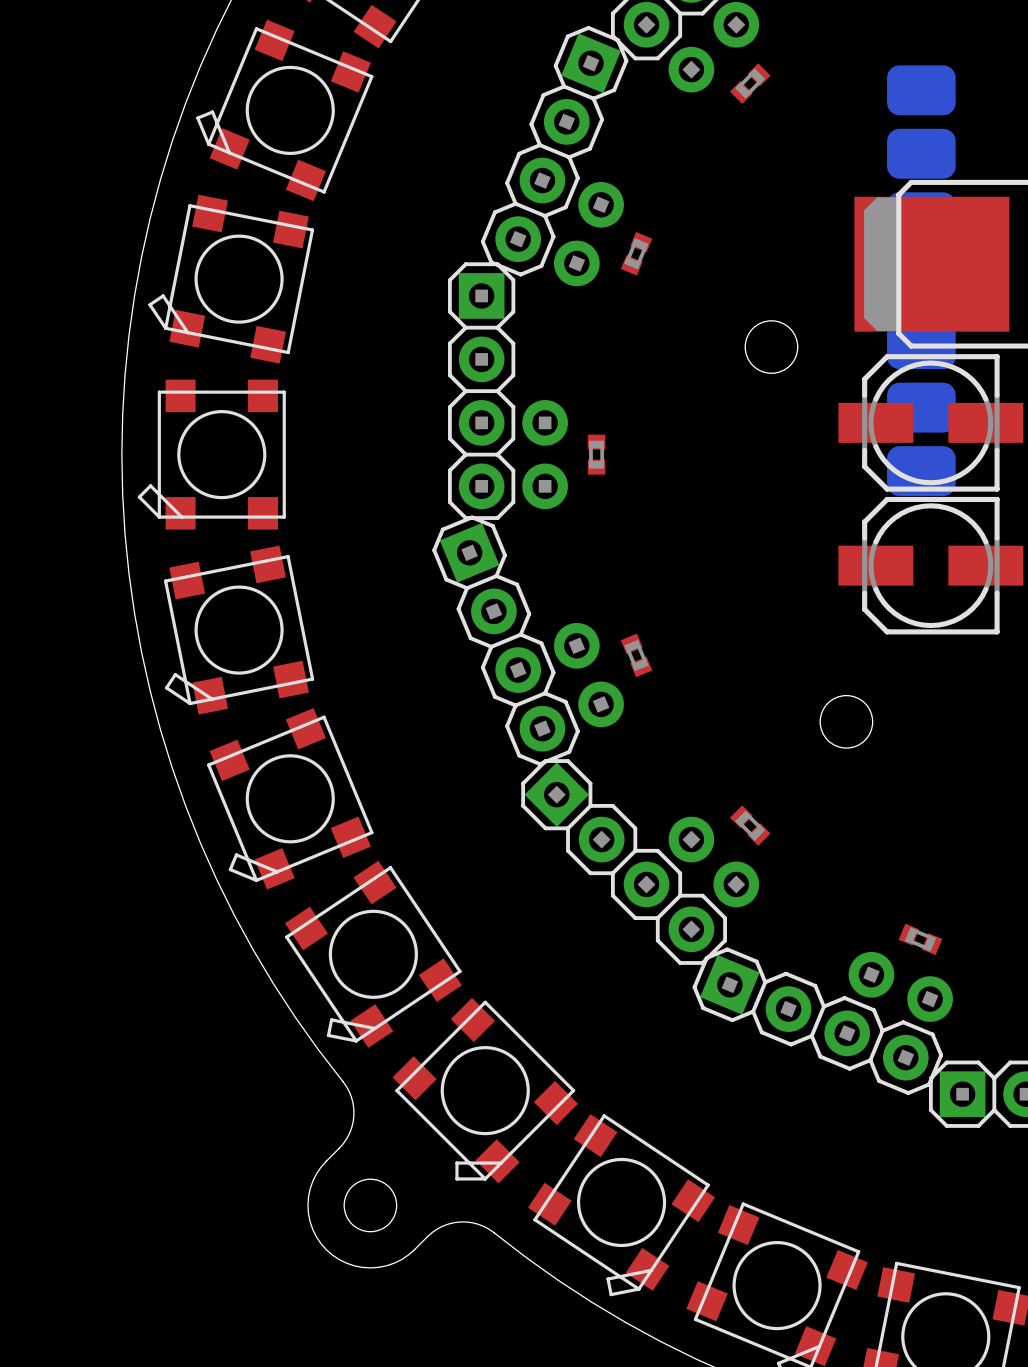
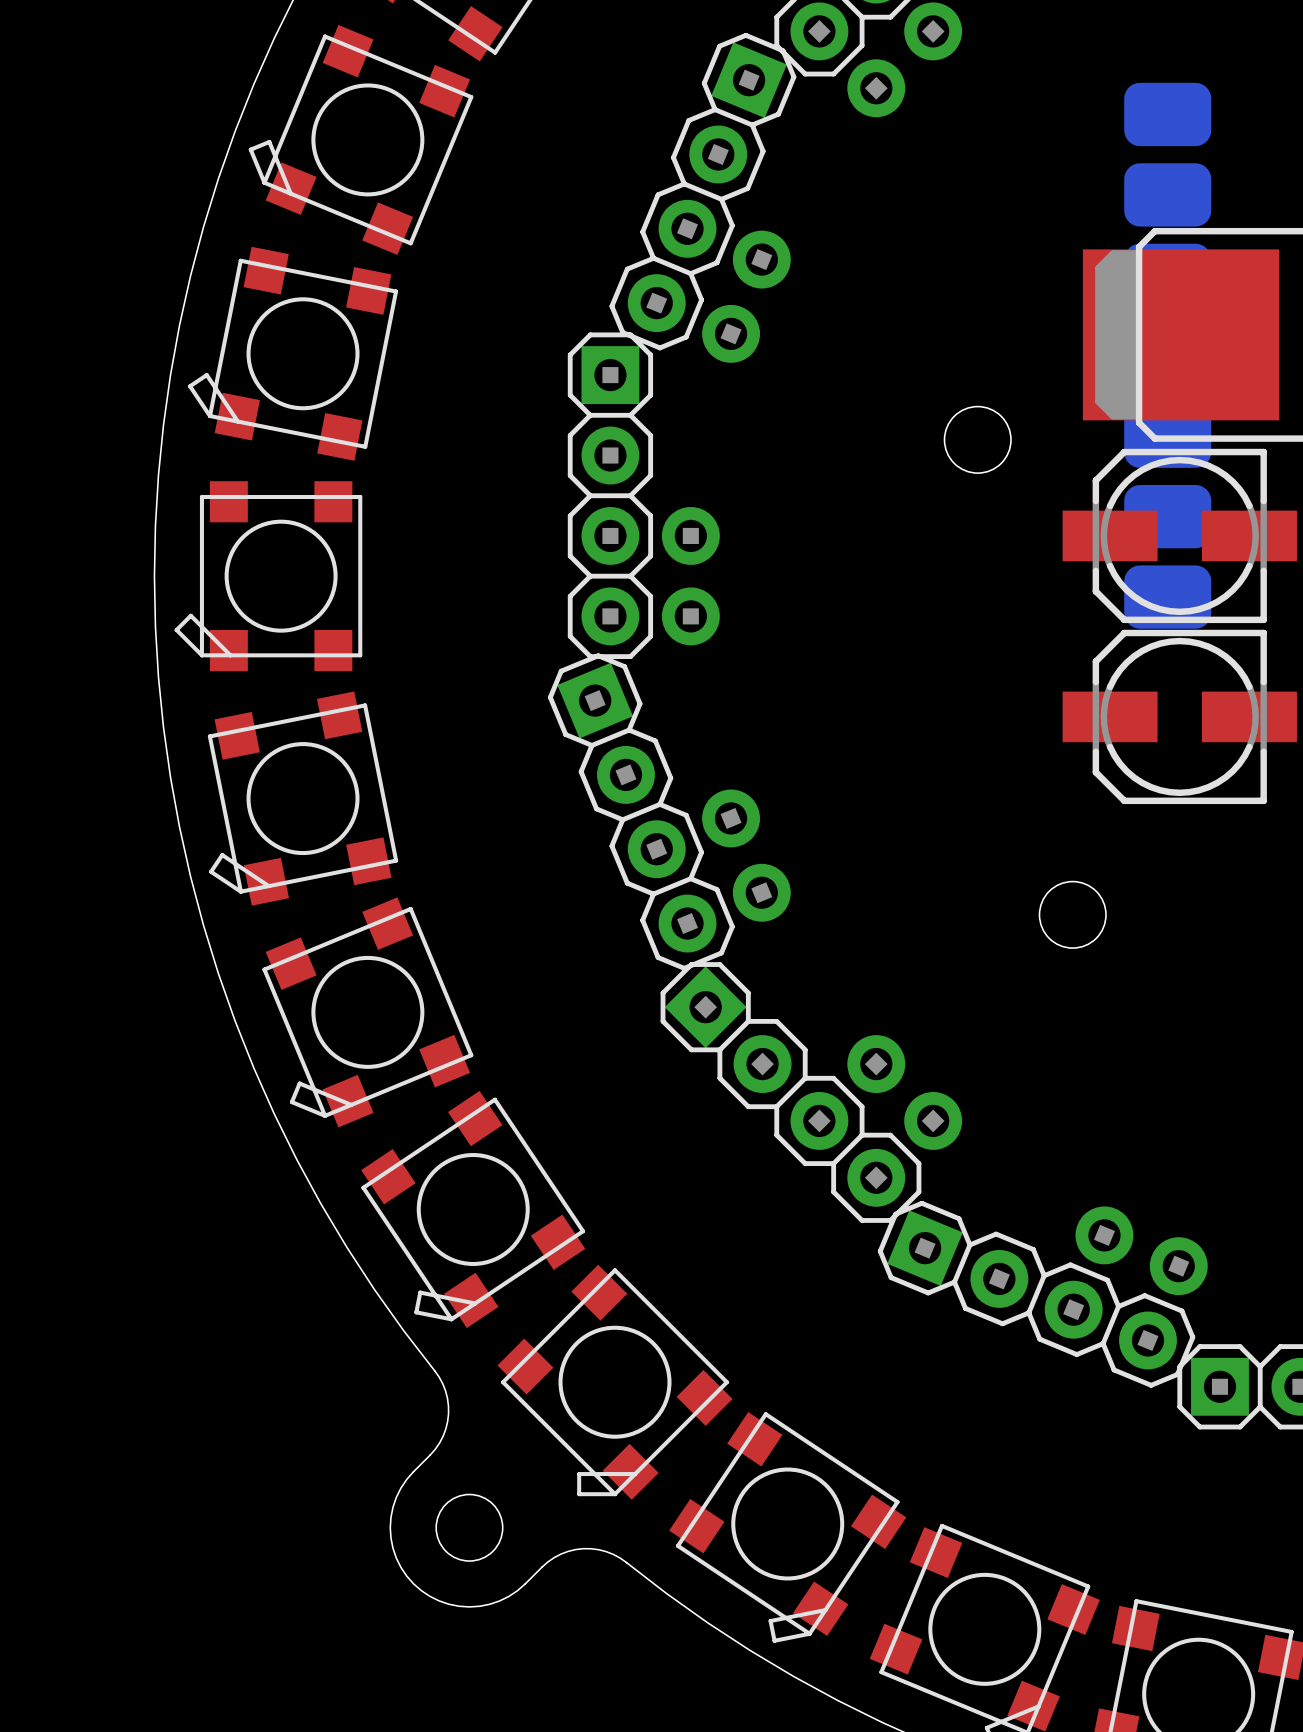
part: (750, 83) -> none
part: (636, 253) -> none
part: (596, 454) -> none
part: (636, 655) -> none
part: (750, 825) -> none
part: (920, 939) -> none

